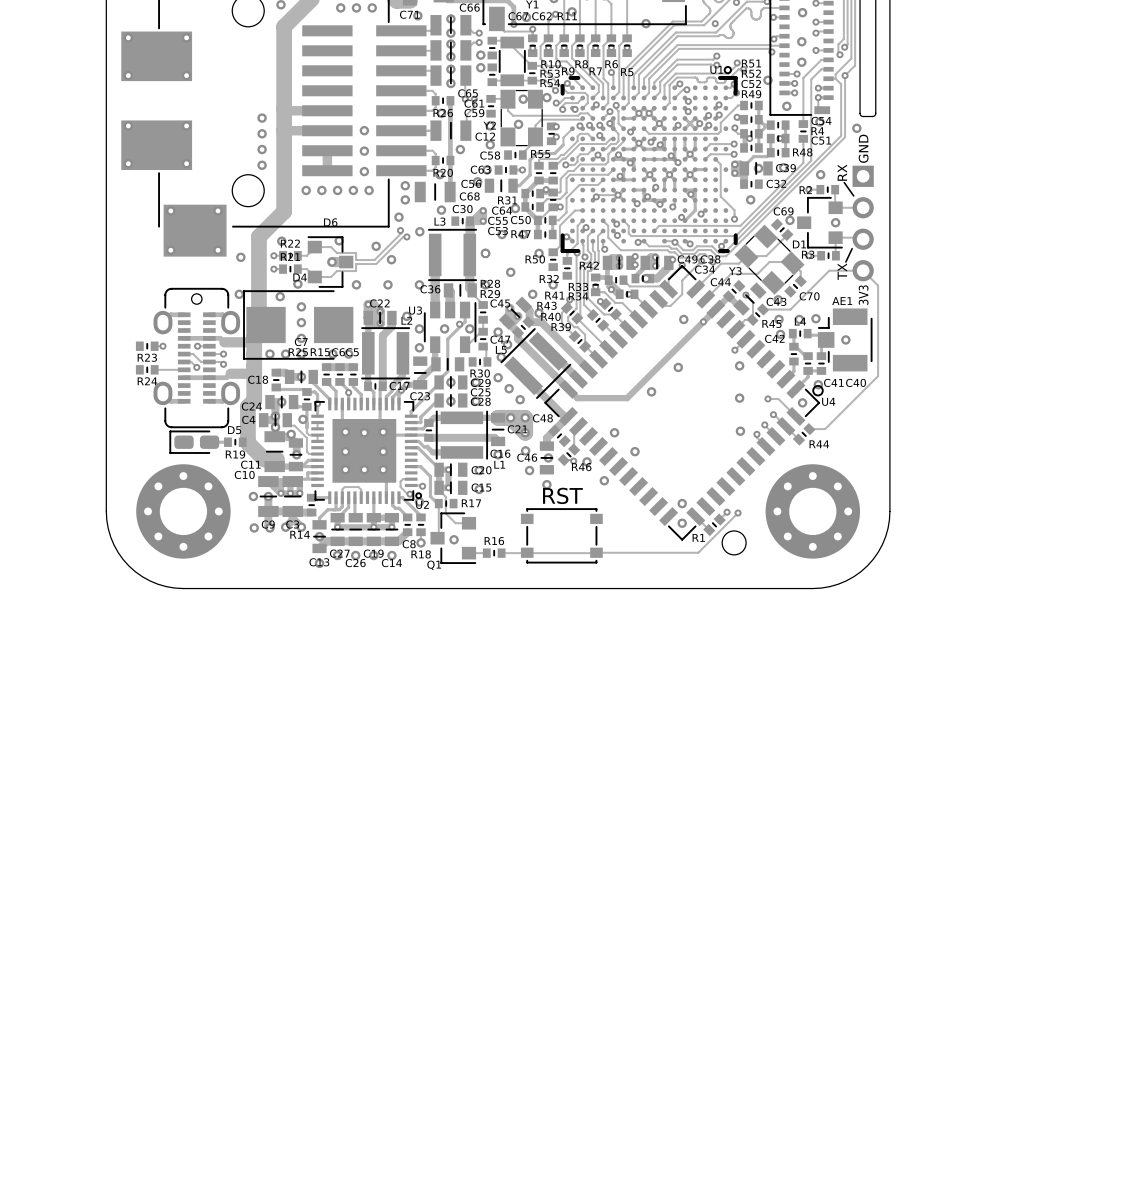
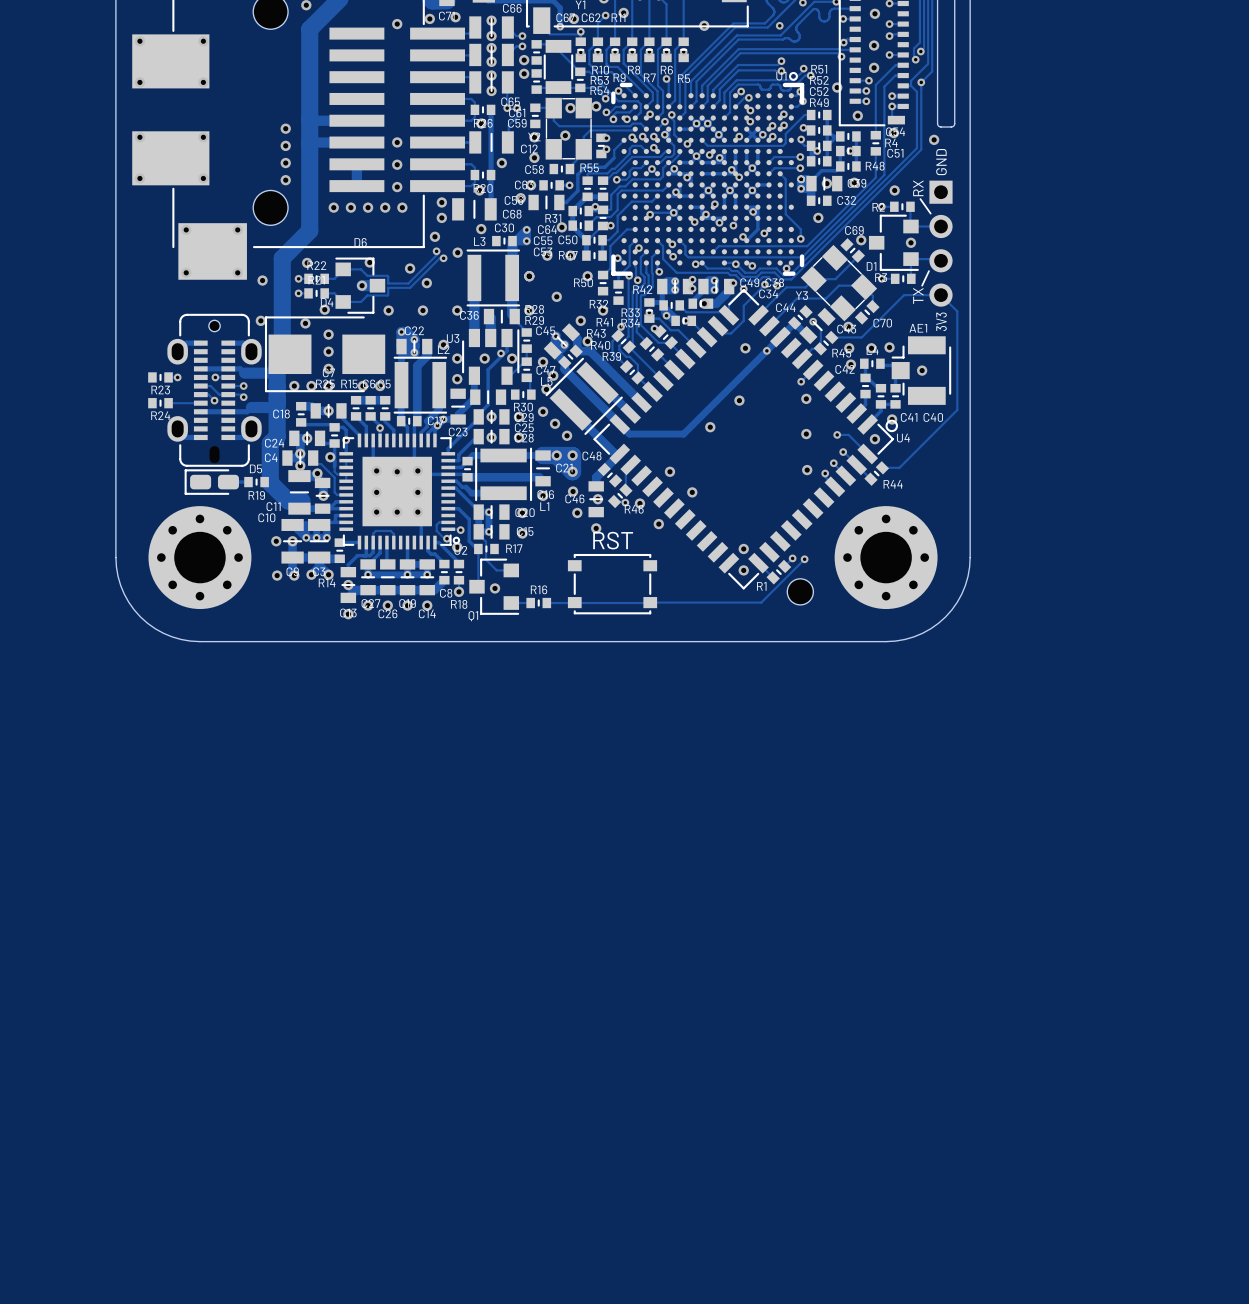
via: (340, 7) -> none
via: (356, 7) -> none
via: (372, 7) -> none
via: none -> (429, 18)
via: none -> (397, 24)

